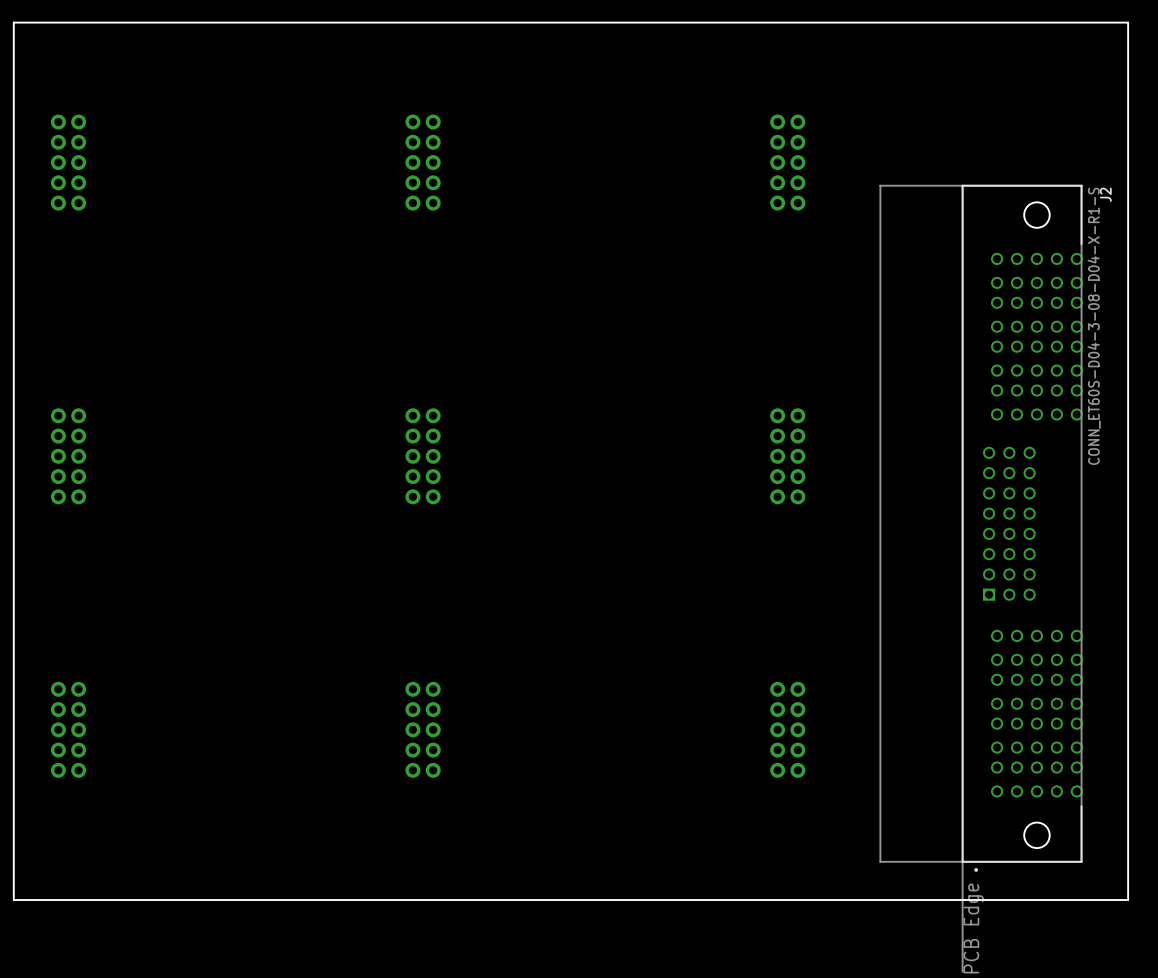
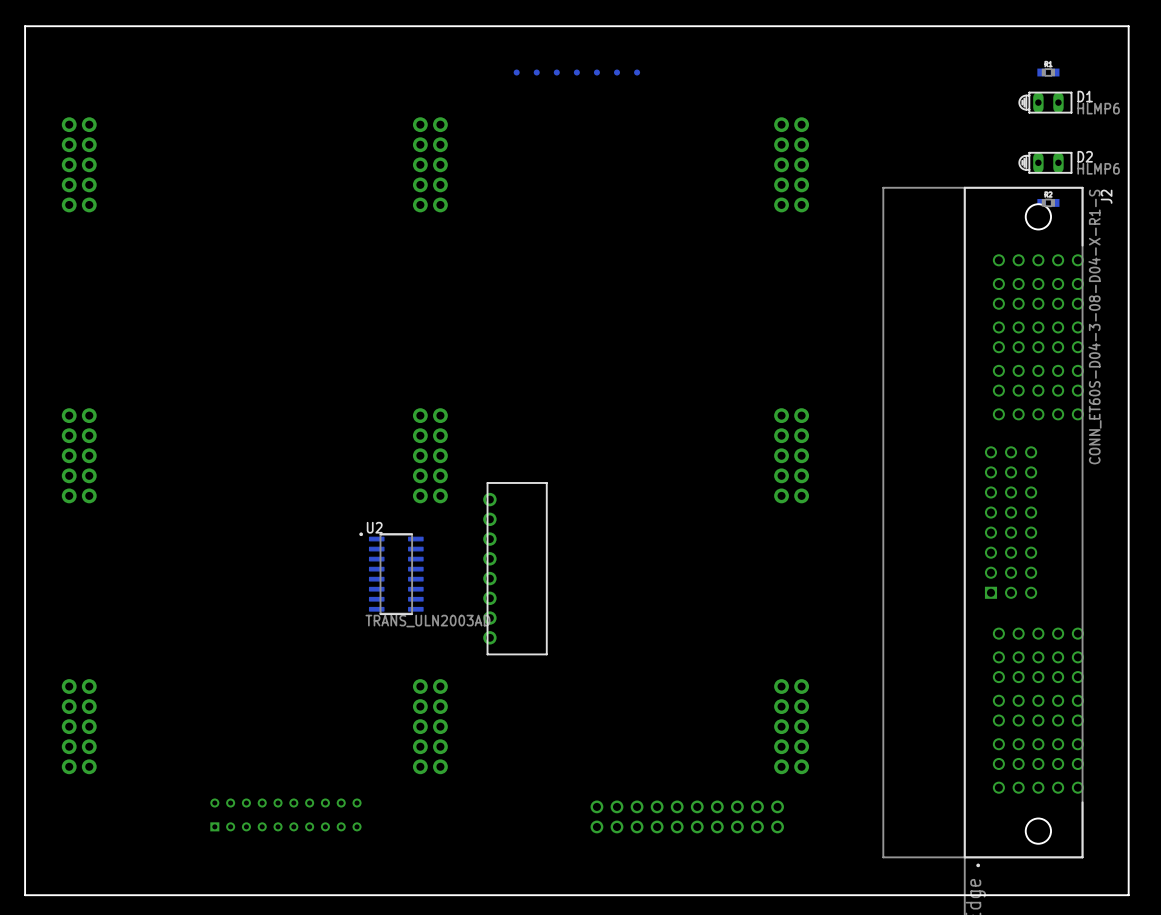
part: none -> (516, 72)
part: none -> (536, 72)
part: none -> (556, 72)
part: none -> (576, 72)
part: none -> (596, 72)
part: none -> (617, 72)
part: none -> (637, 72)
part: none -> (1048, 72)
D1: none -> HLMP6 (1045, 102)
D2: none -> HLMP6 (1045, 162)
part: none -> (1048, 202)
part: none -> (515, 568)
U2: none -> TRANS_ULN2003AD (391, 573)
part: none -> (285, 814)
part: none -> (687, 816)

